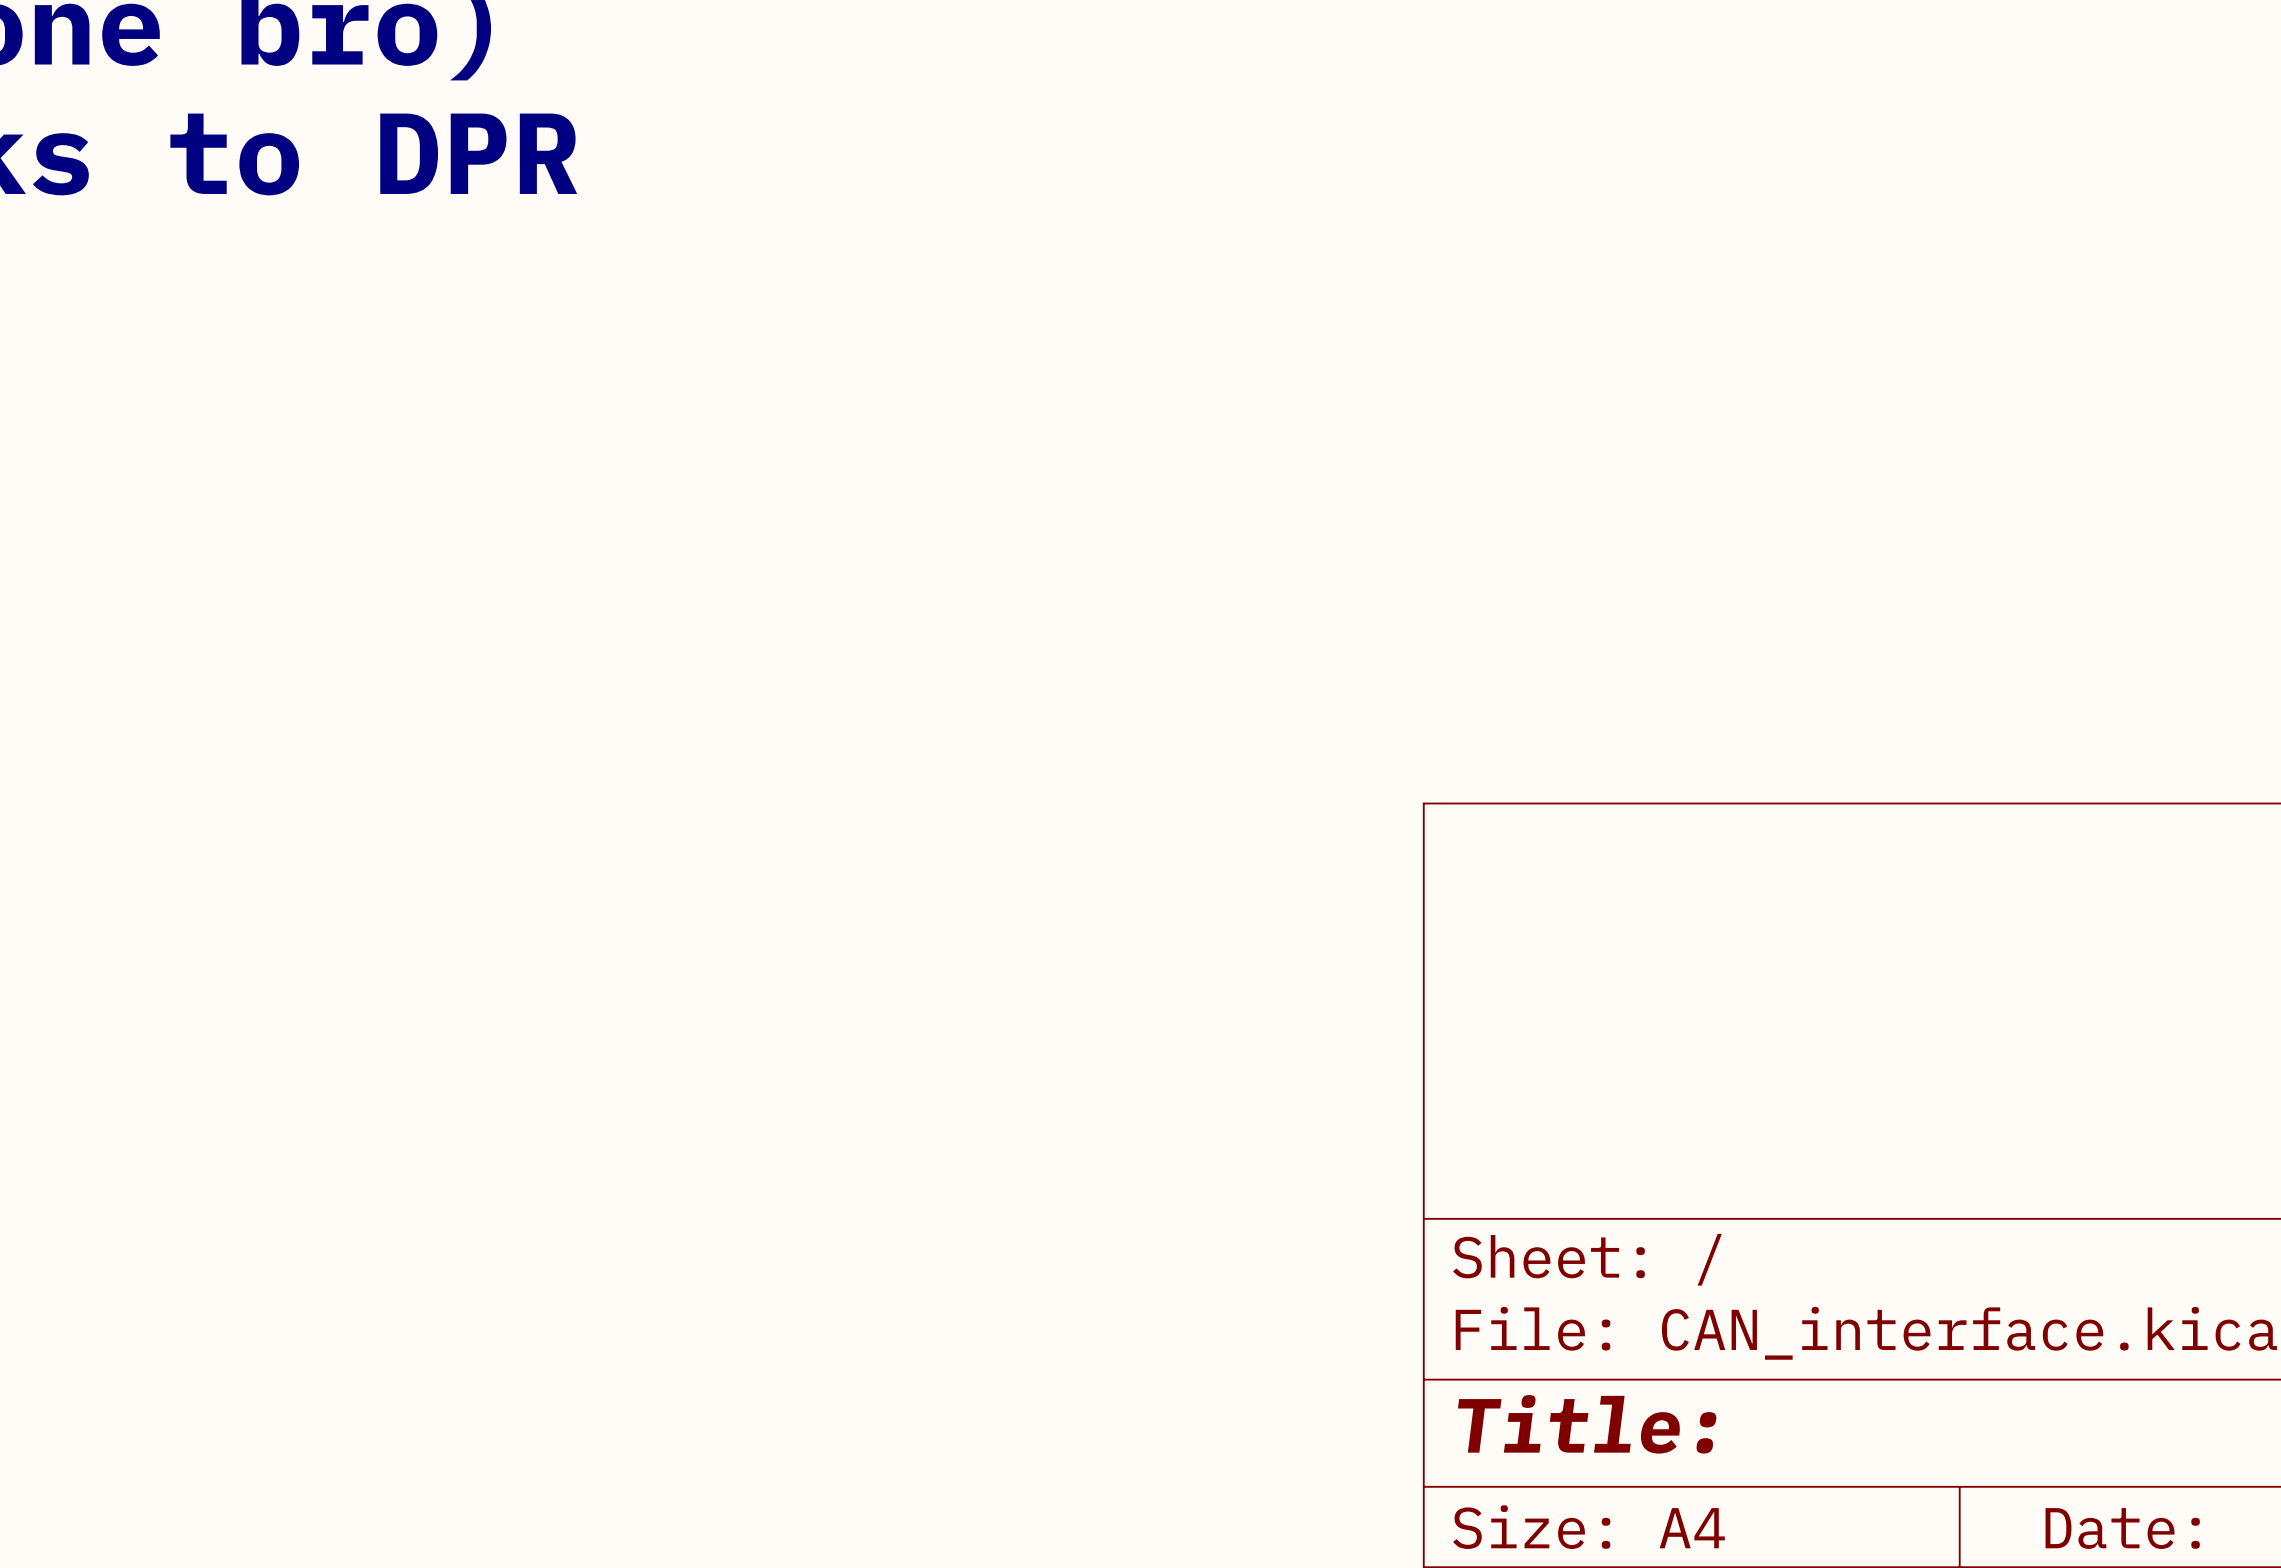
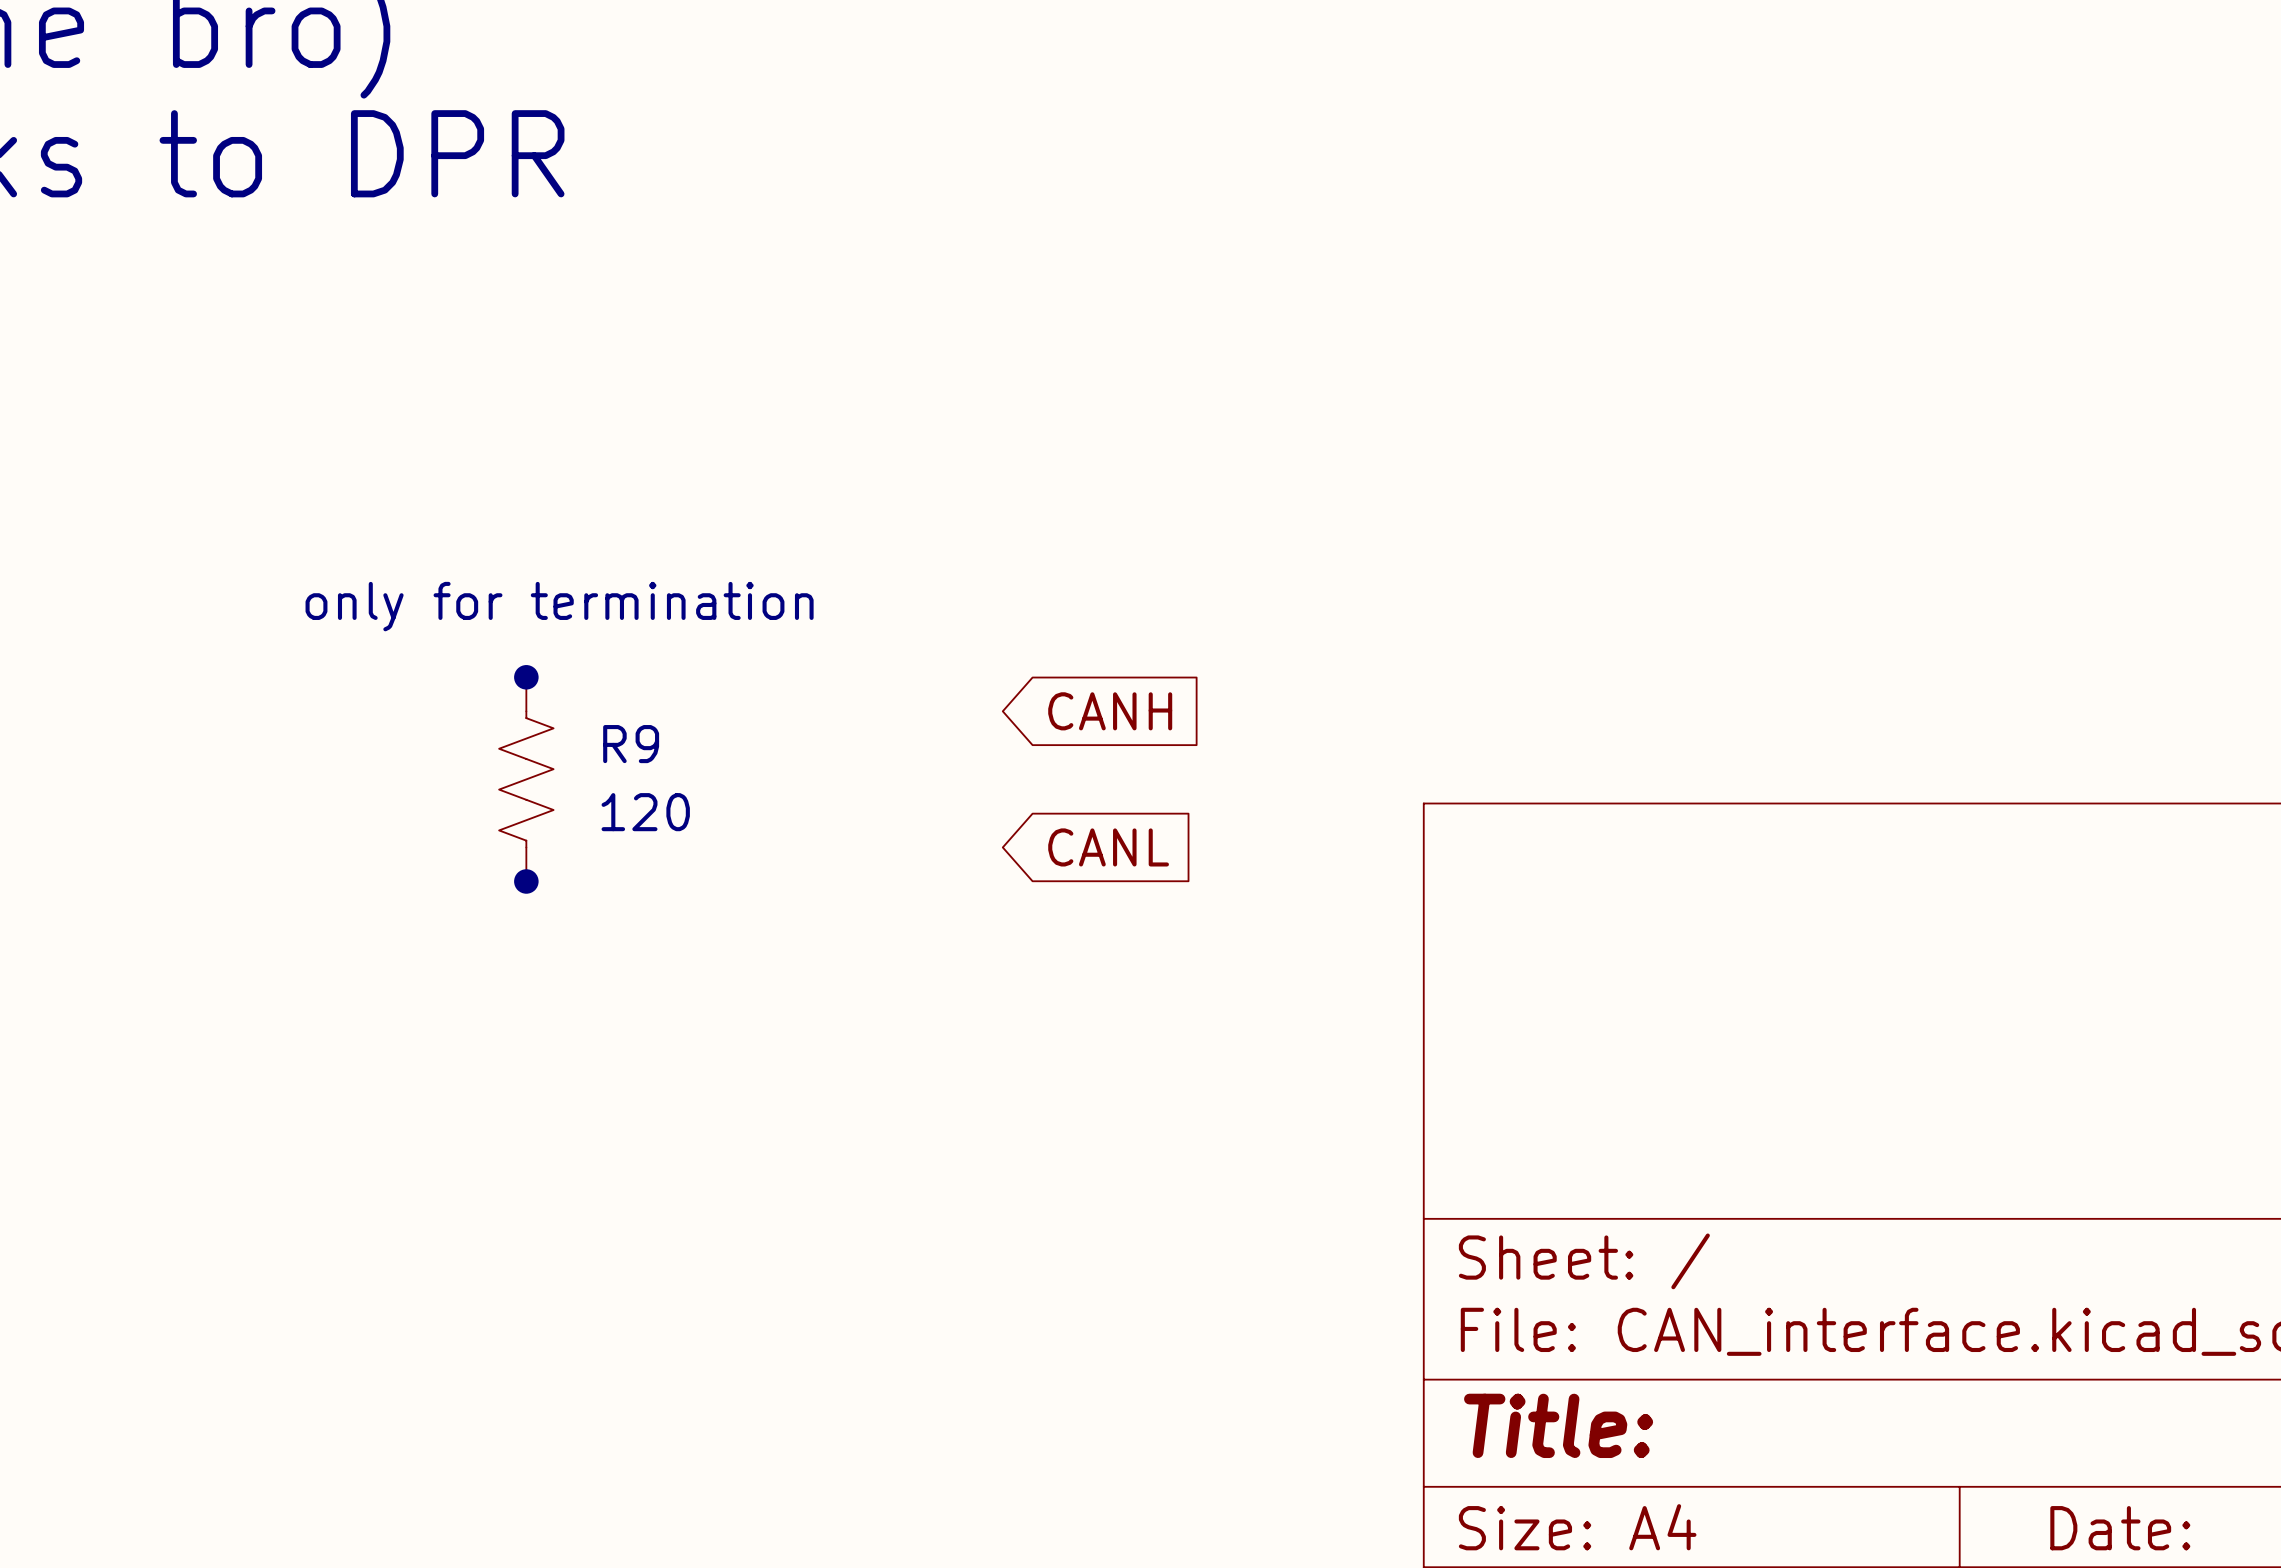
text: none -> only for termination (559, 606)
junction: none -> (526, 677)
global label: none -> CANH (1110, 711)
R9: none -> 120 (526, 779)
global label: none -> CANL (1108, 847)
junction: none -> (526, 881)

